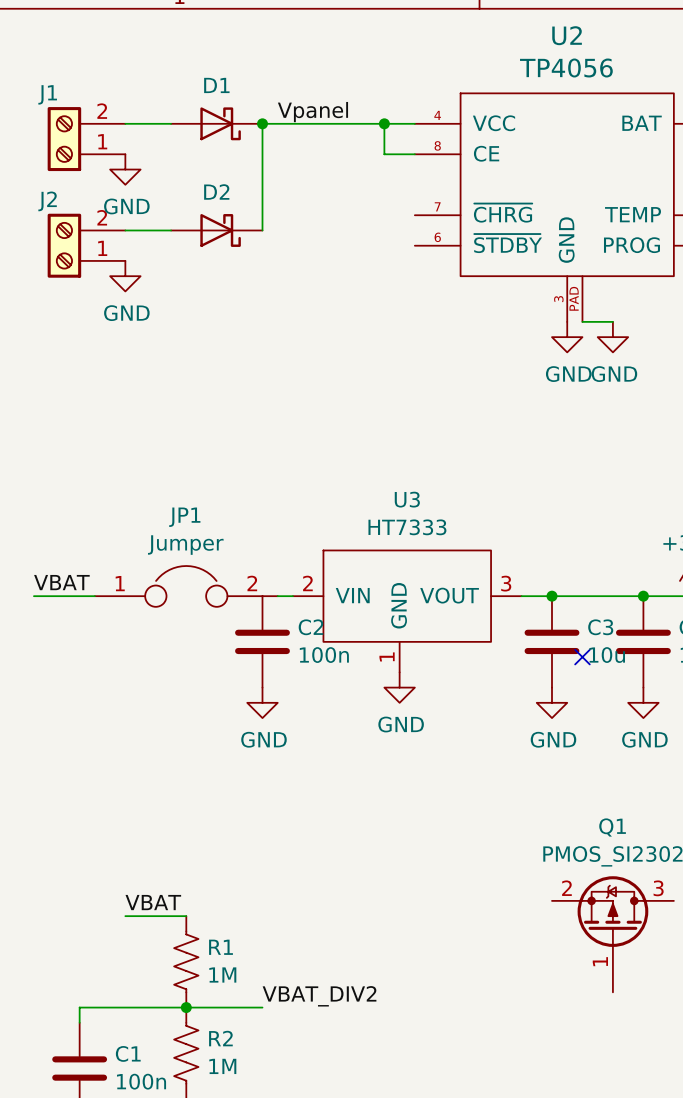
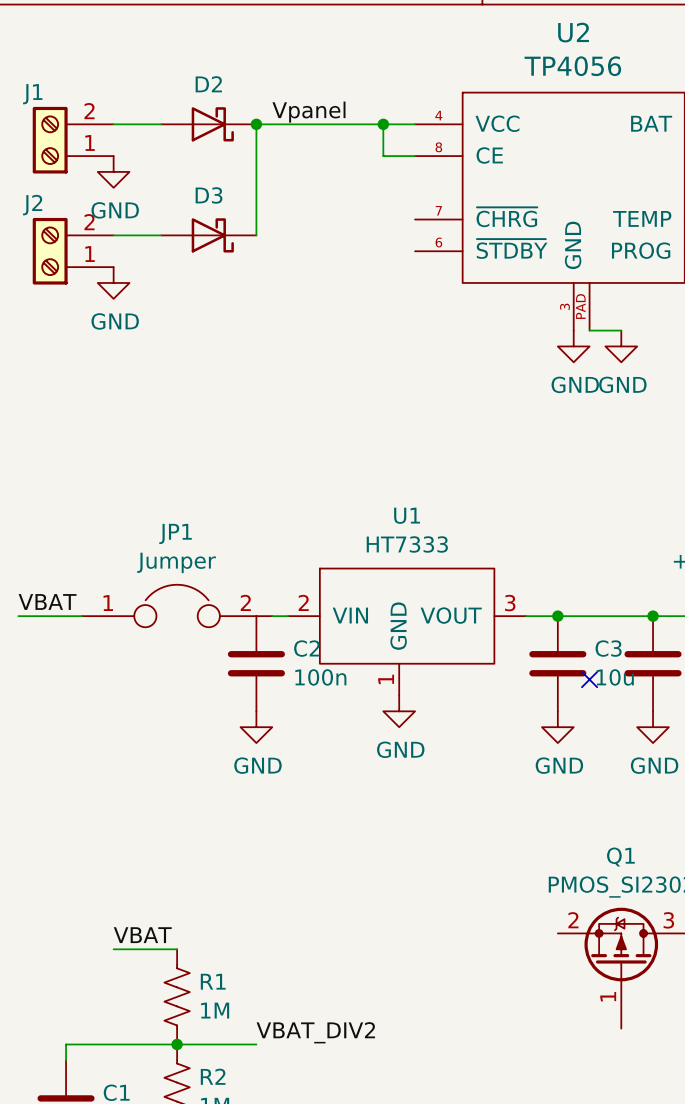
D1 name: D1 (216, 85) -> D2 (208, 84)
D2 name: D2 (216, 191) -> D3 (209, 195)
U3 name: U3 (407, 499) -> U1 (407, 515)

